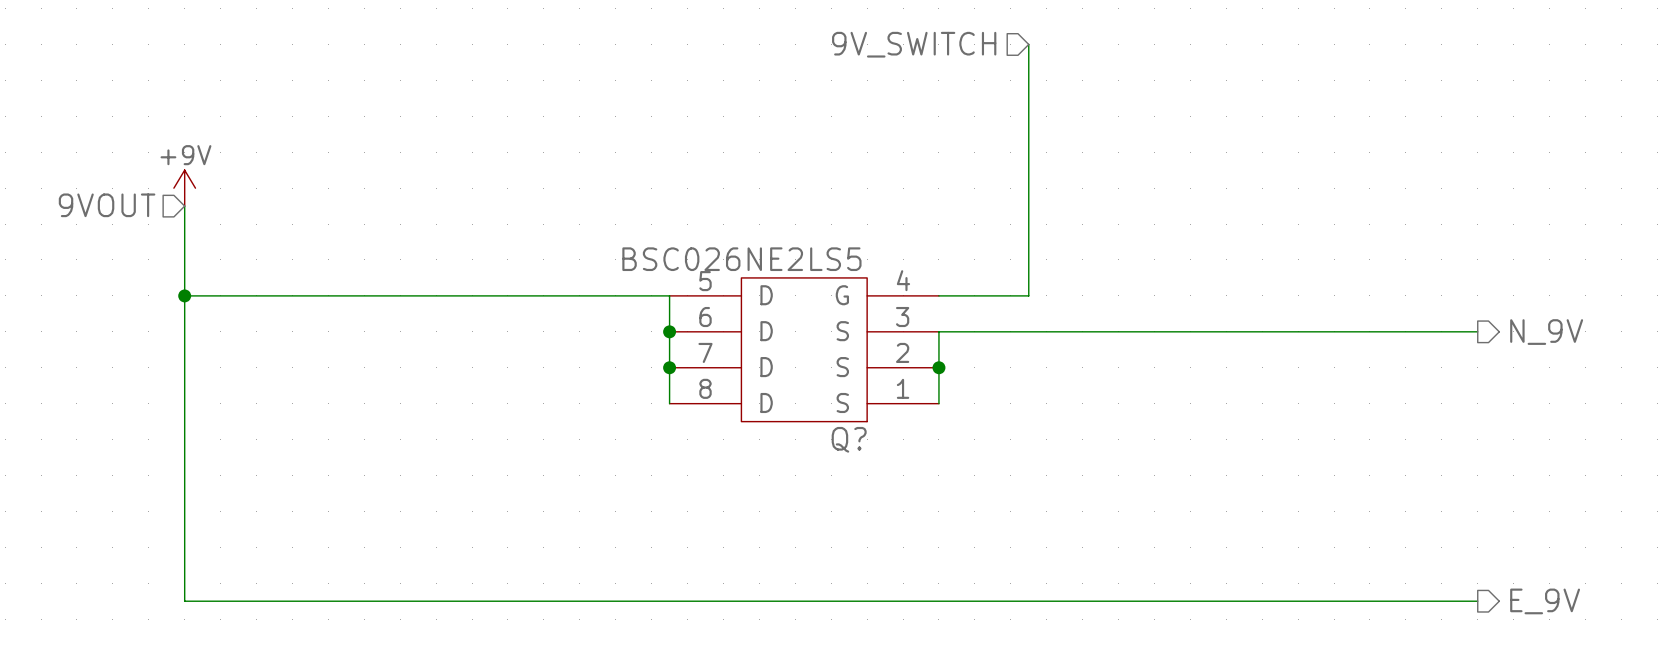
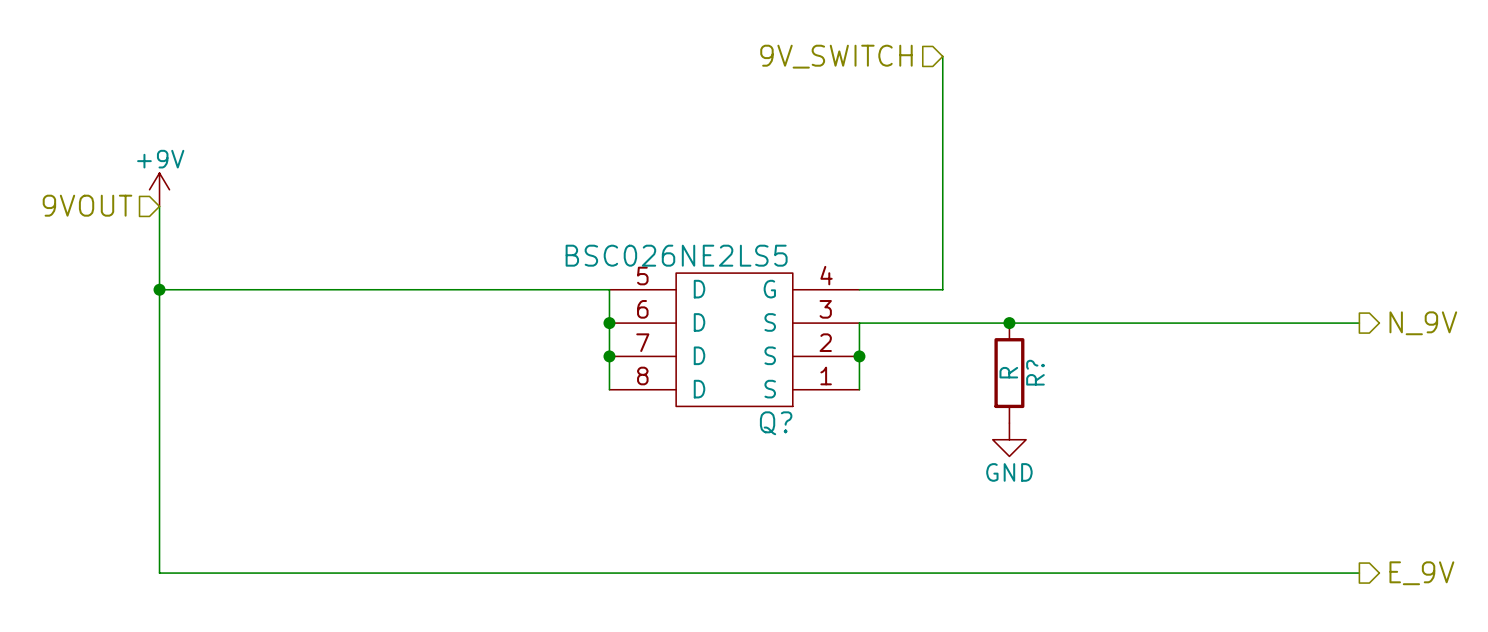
junction: none -> (1009, 323)
R?: none -> R (1009, 373)
power symbol: none -> GND (1009, 439)

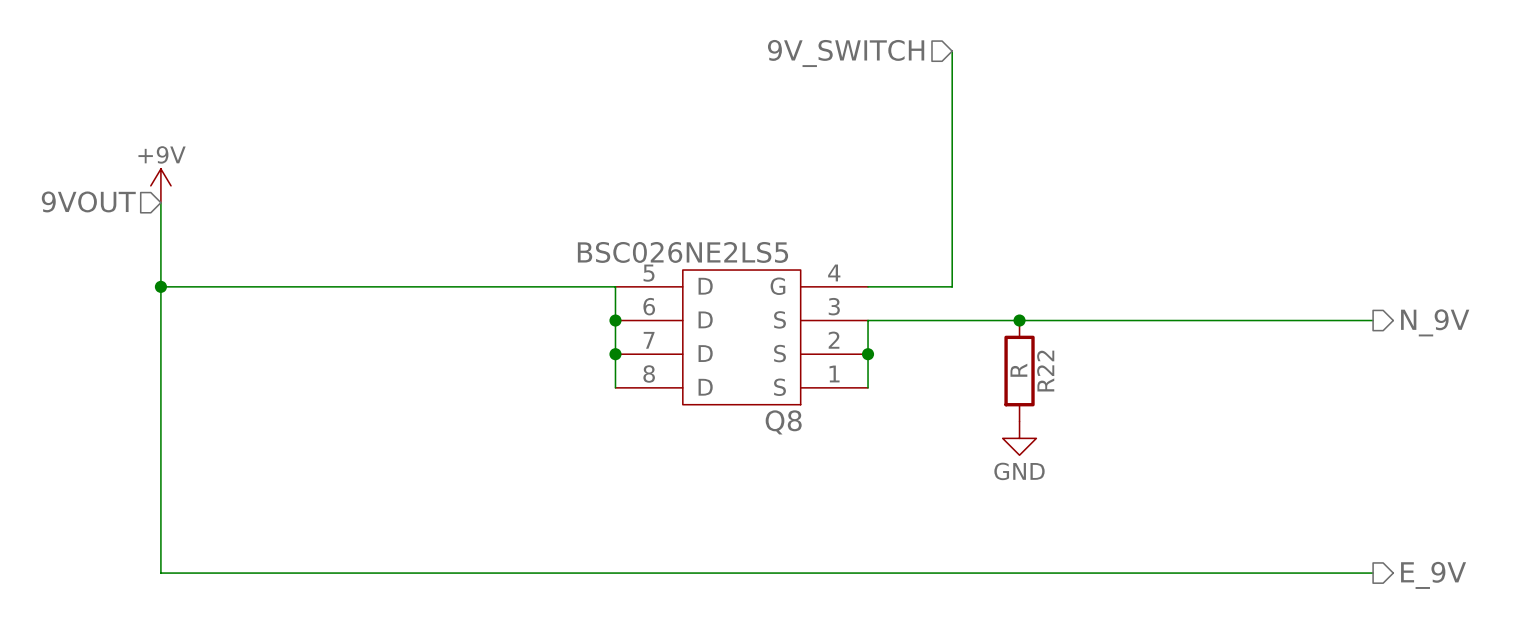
R? name: R? (1035, 372) -> R22 (1045, 371)
Q? name: Q? (776, 423) -> Q8 (783, 422)

